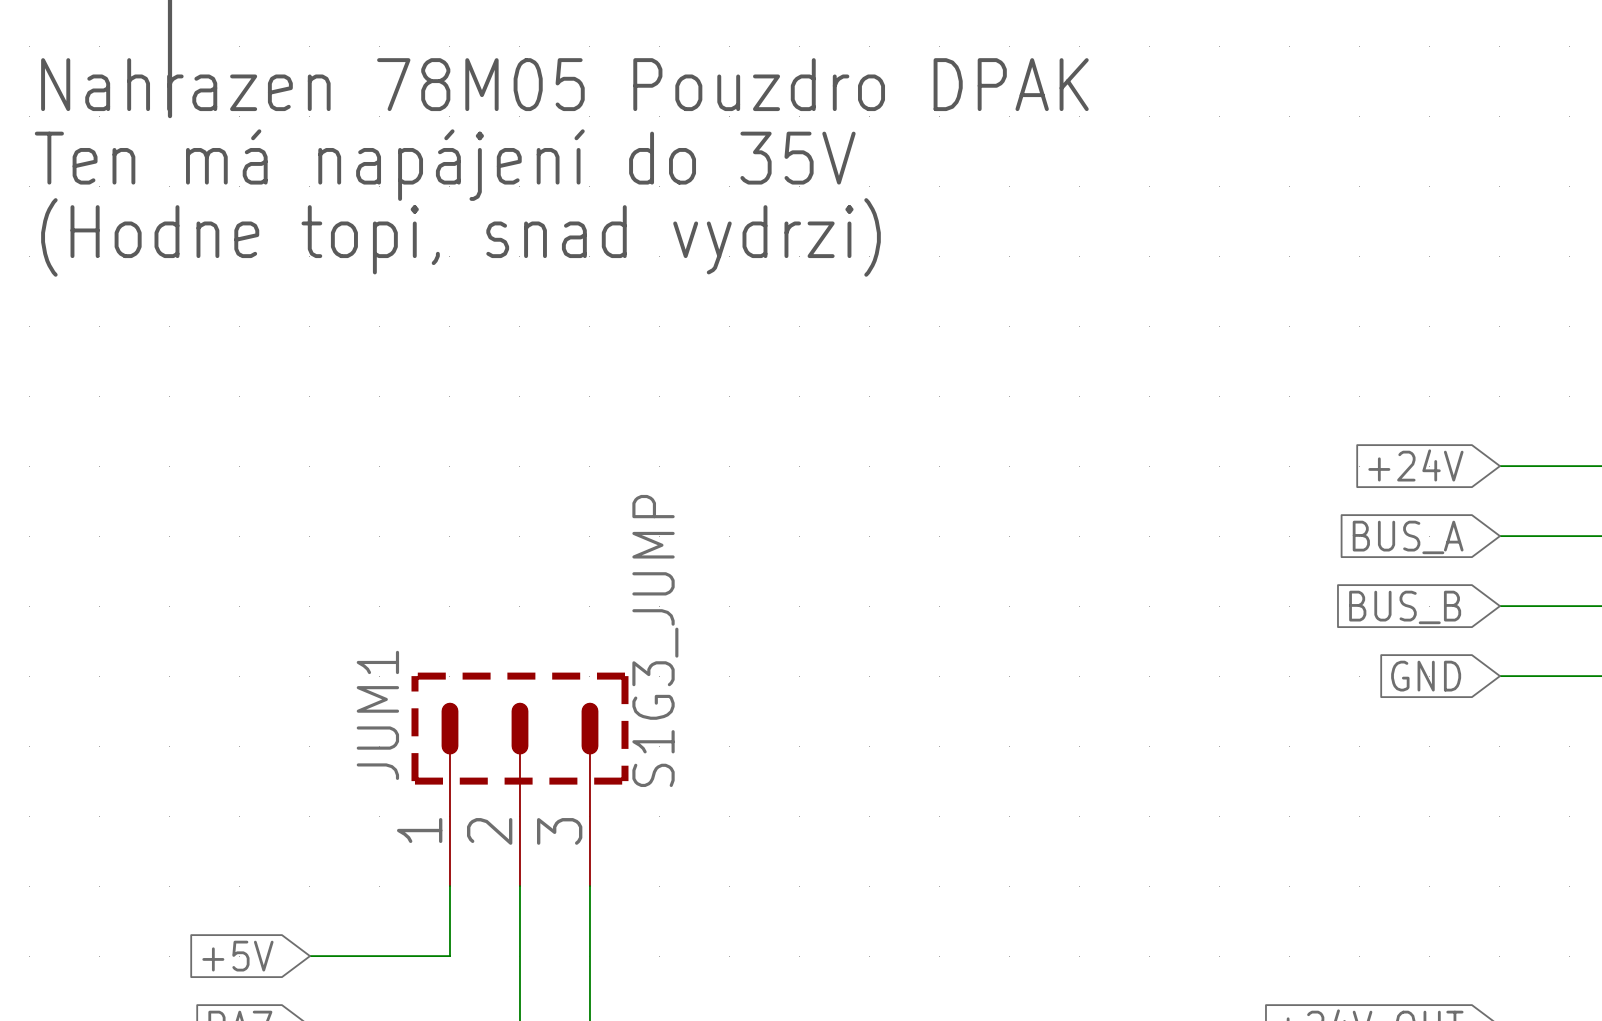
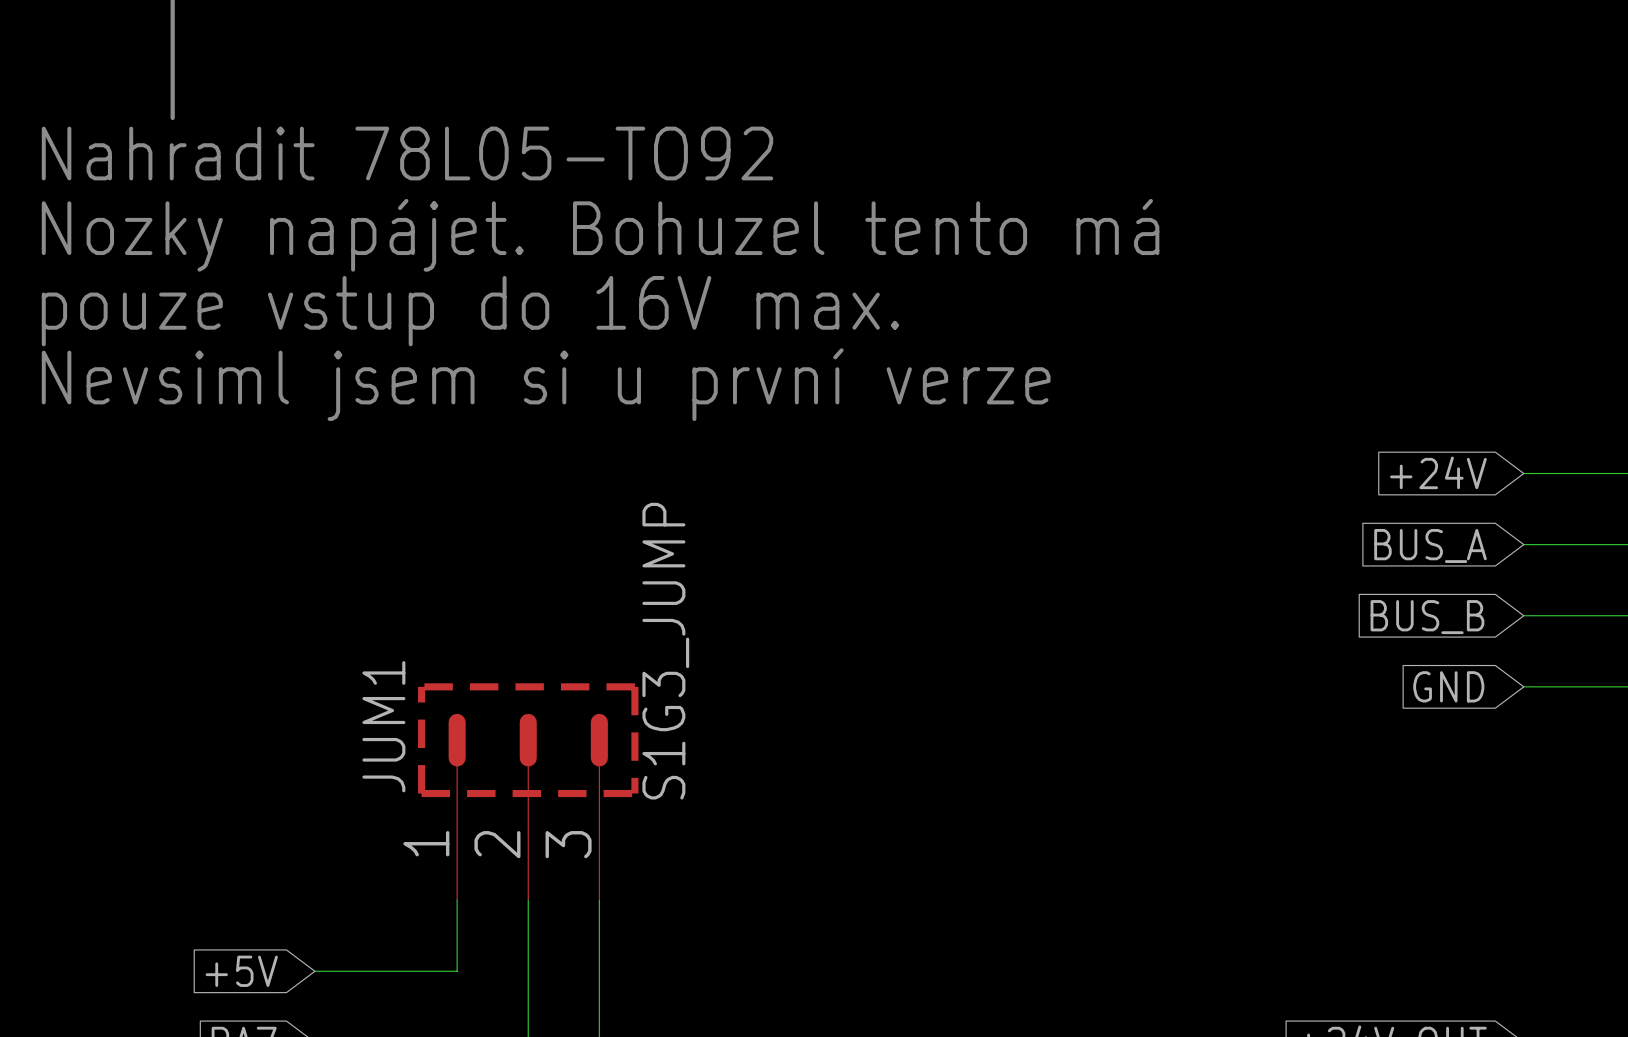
text: Nahrazen 78M05 Pouzdro DPAK (564, 84) -> none
text: Ten má napájení do 35V (445, 165) -> Nahradit 78L05-TO92 (407, 153)
text: (Hodne topi, snad vydrzi) (460, 237) -> Nozky napájet. Bohuzel tento má (600, 235)
text: none -> pouze vstup do 16V max. (470, 311)
text: none -> Nevsiml jsem si u první verze (546, 384)

